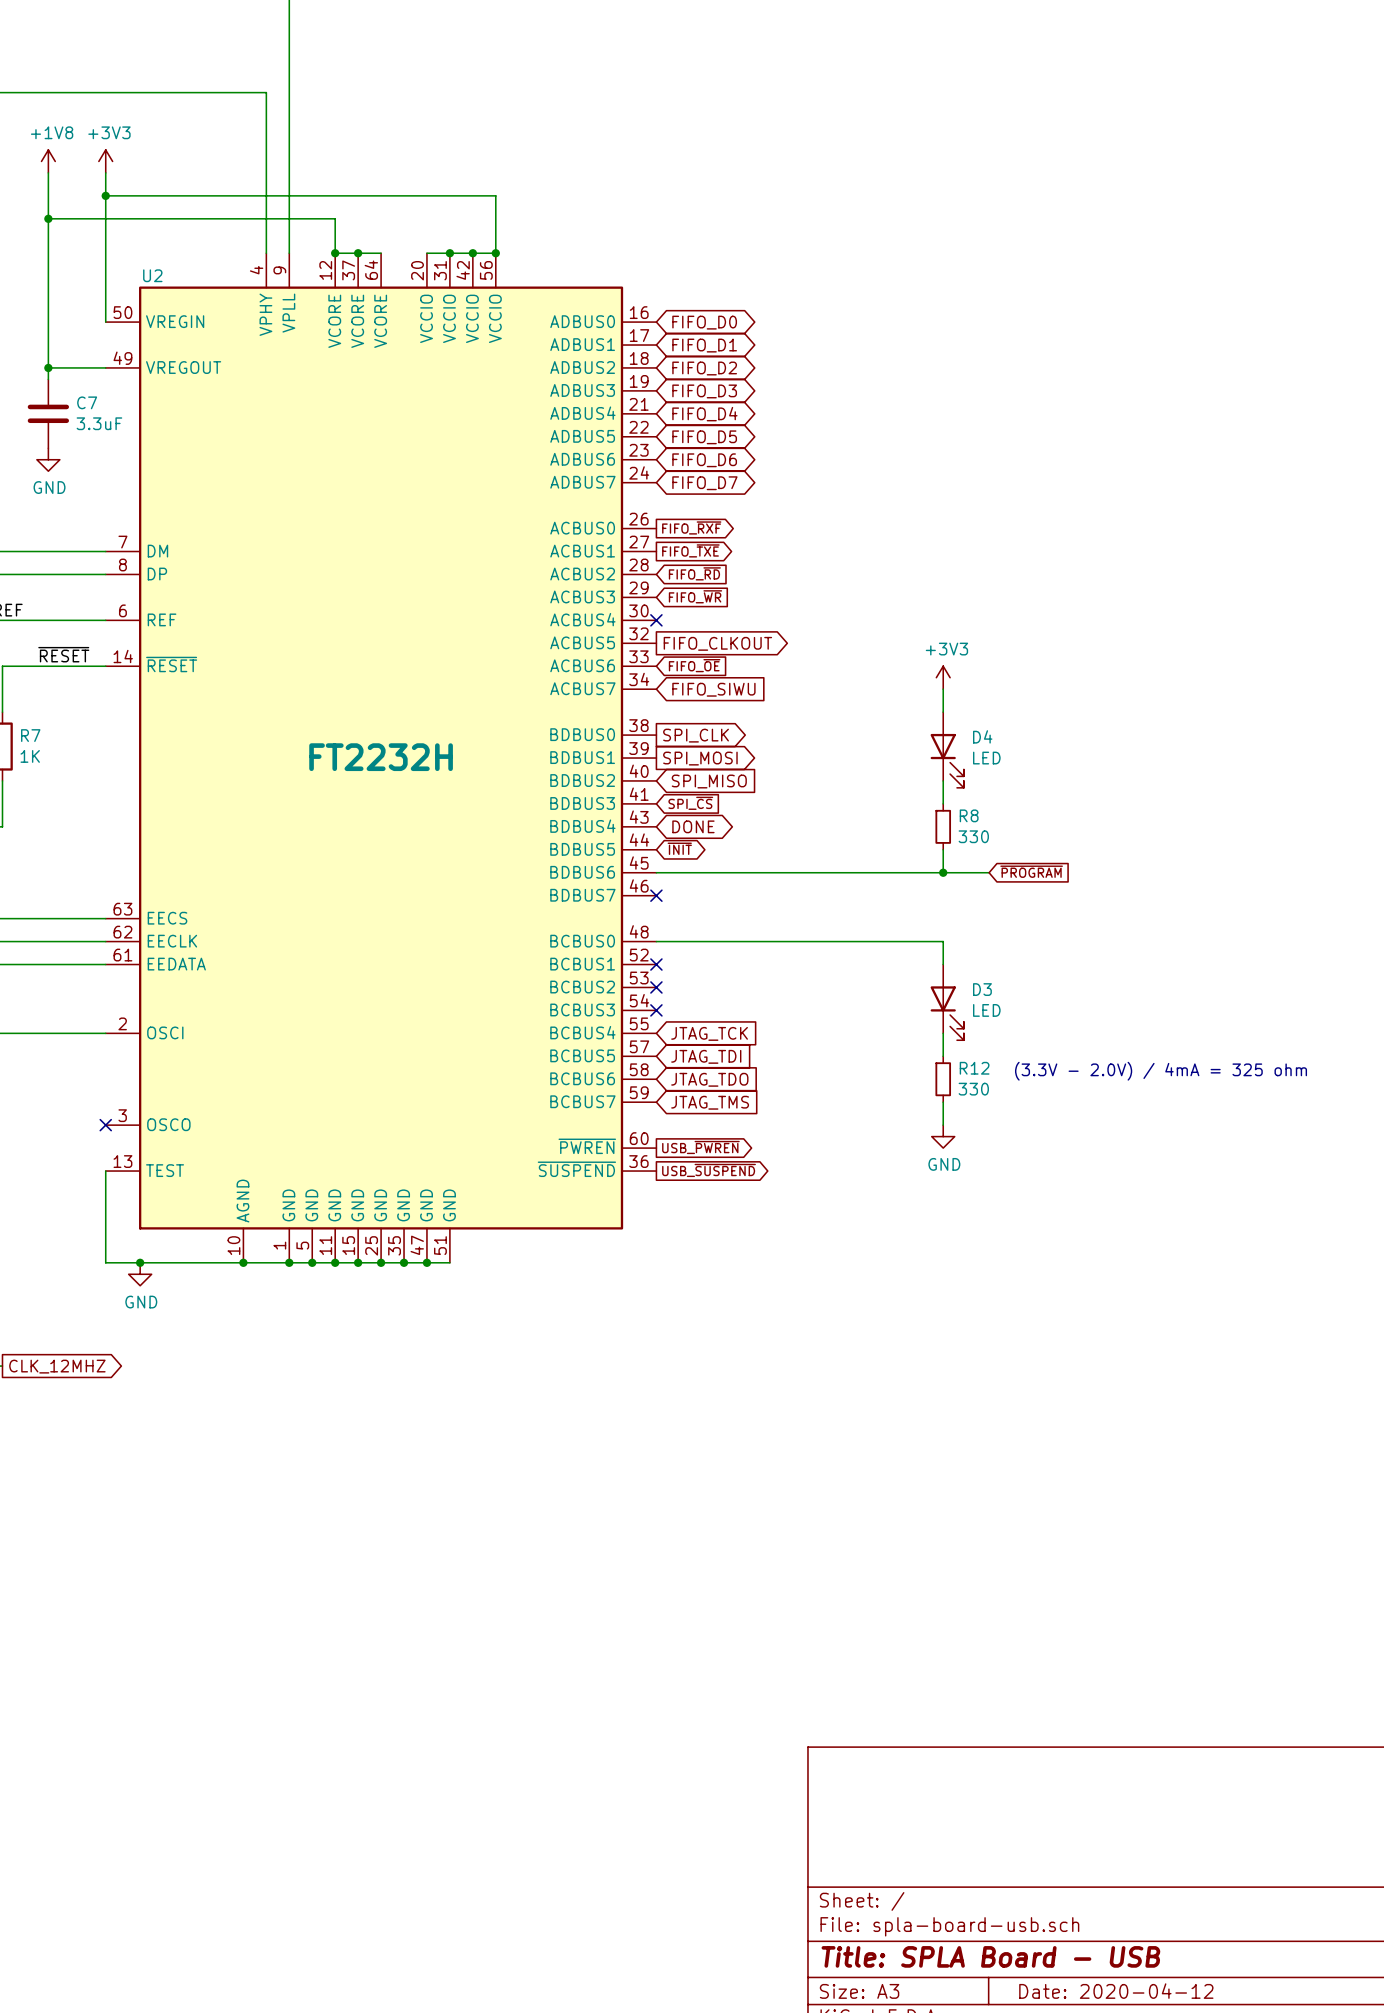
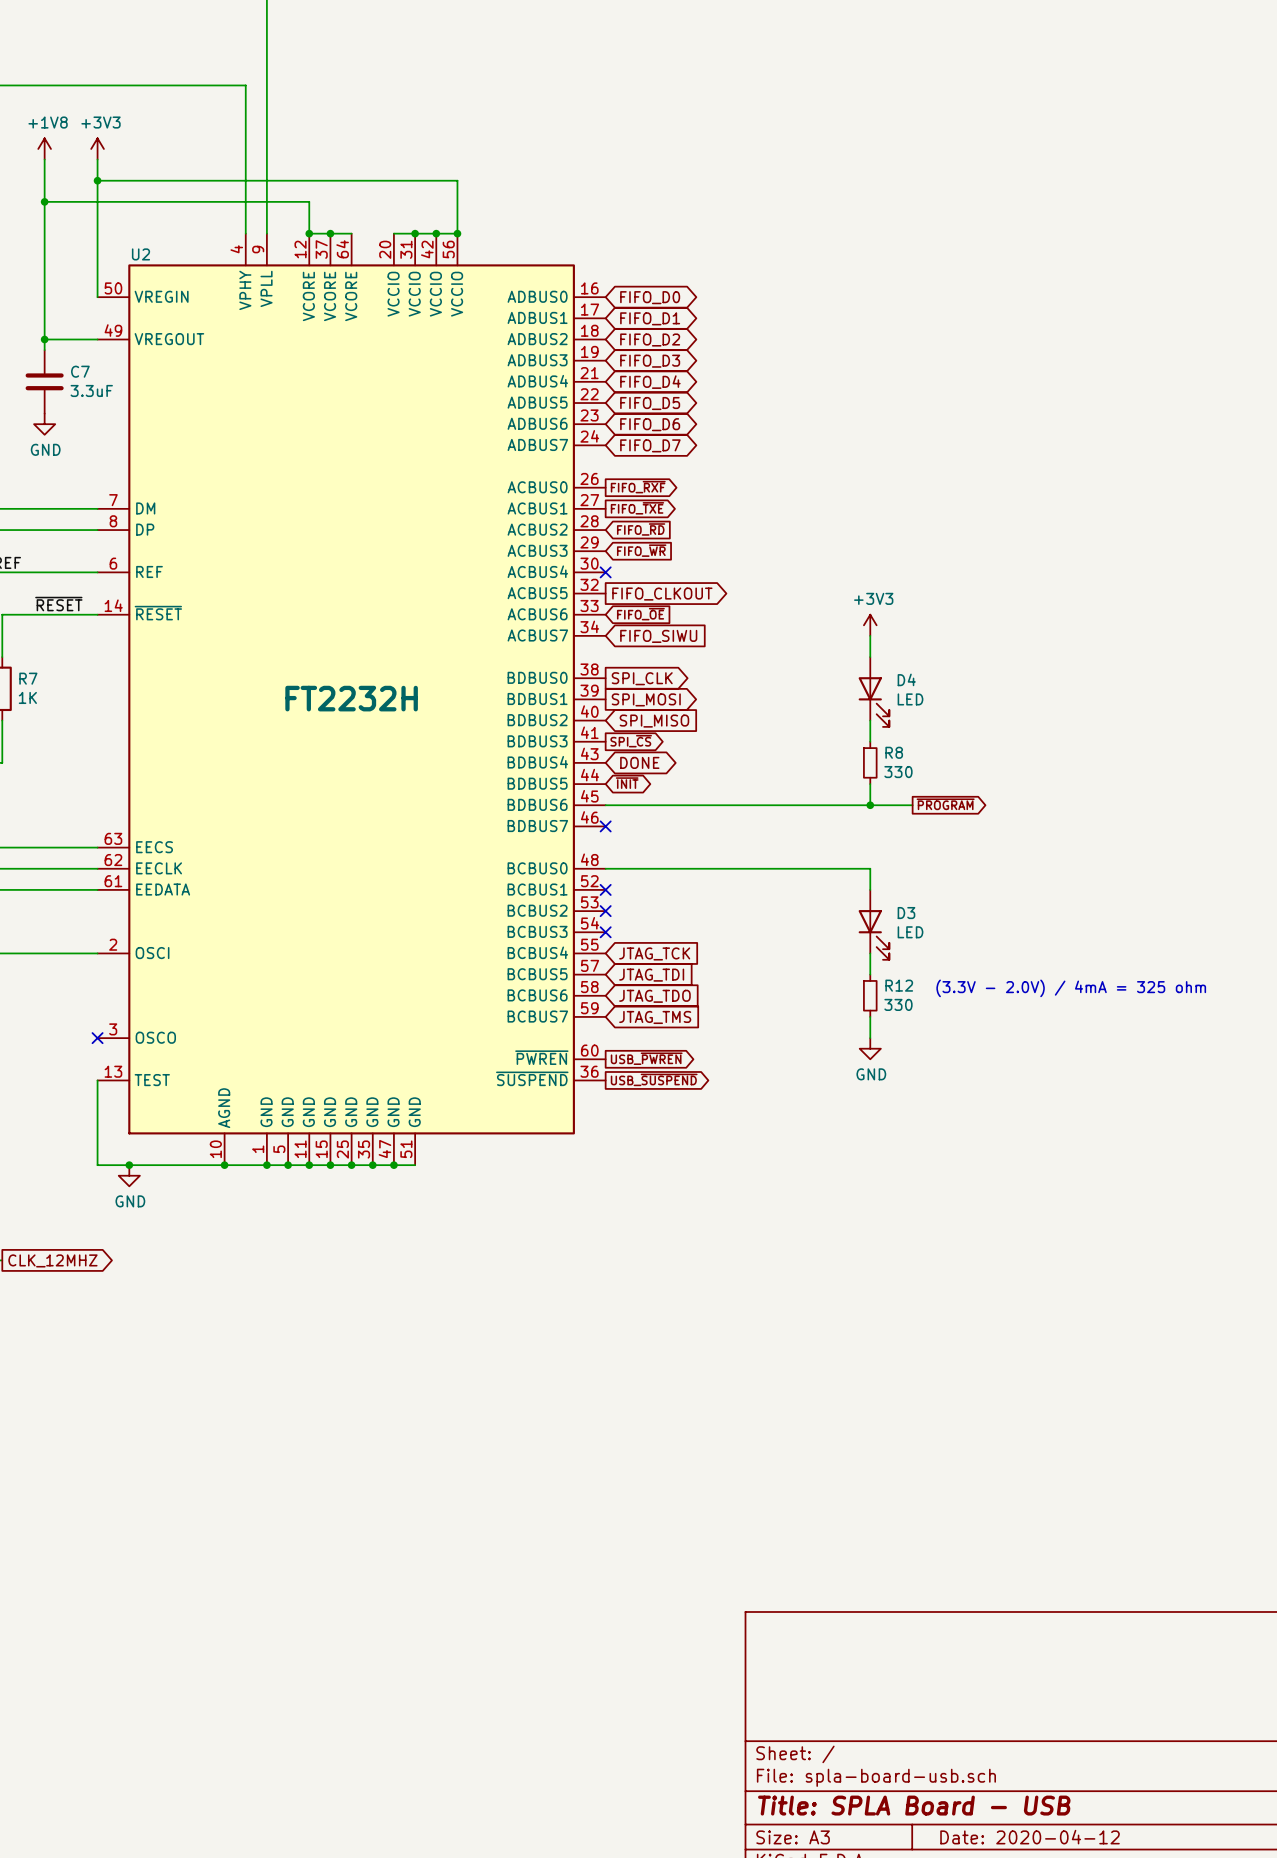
global label shape: input (690, 803) -> output (631, 741)
global label shape: input (1031, 871) -> output (945, 804)

